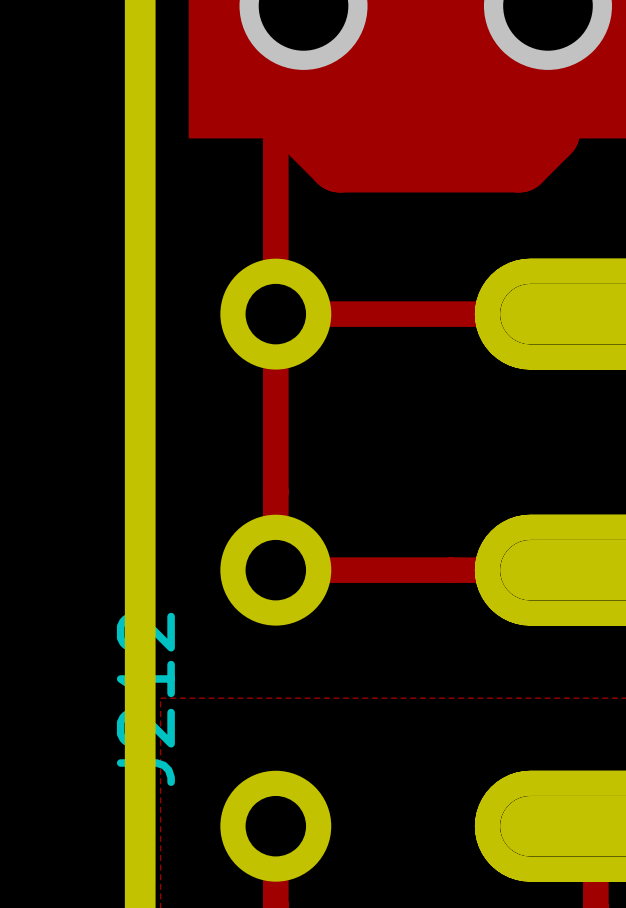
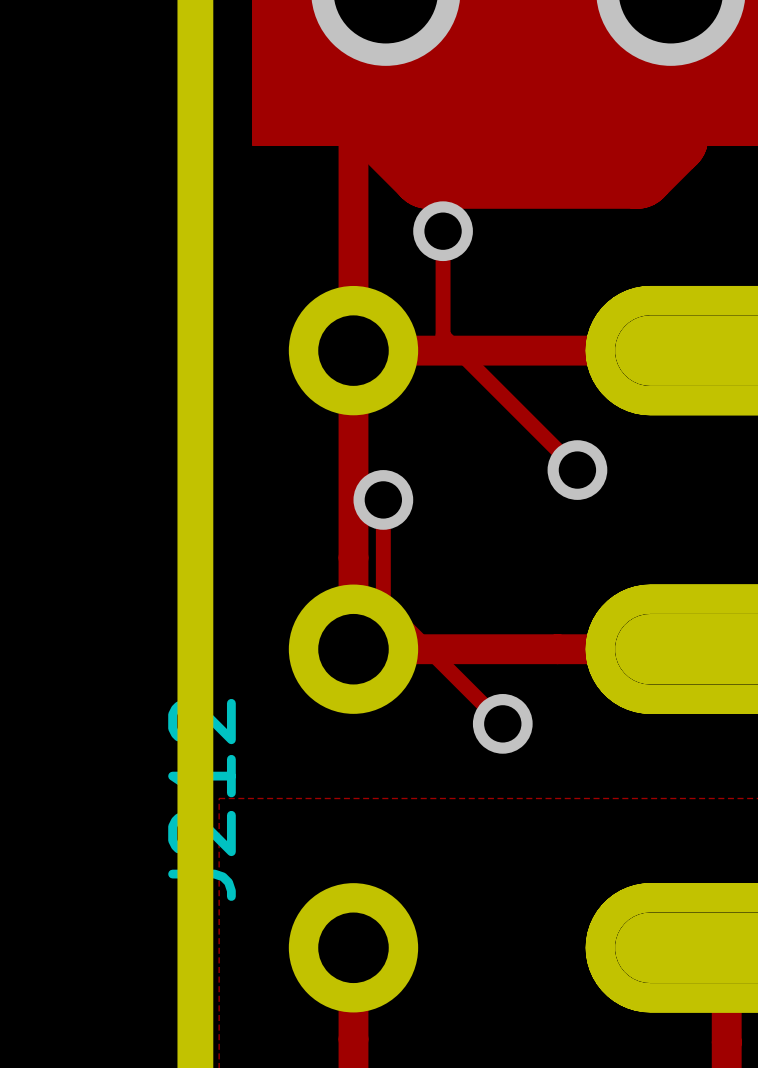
track: none -> (443, 231) (443, 335) (577, 470)
via: none -> (443, 231)
via: none -> (577, 470)
track: none -> (383, 499) (383, 604) (502, 723)
via: none -> (383, 499)
via: none -> (502, 723)

